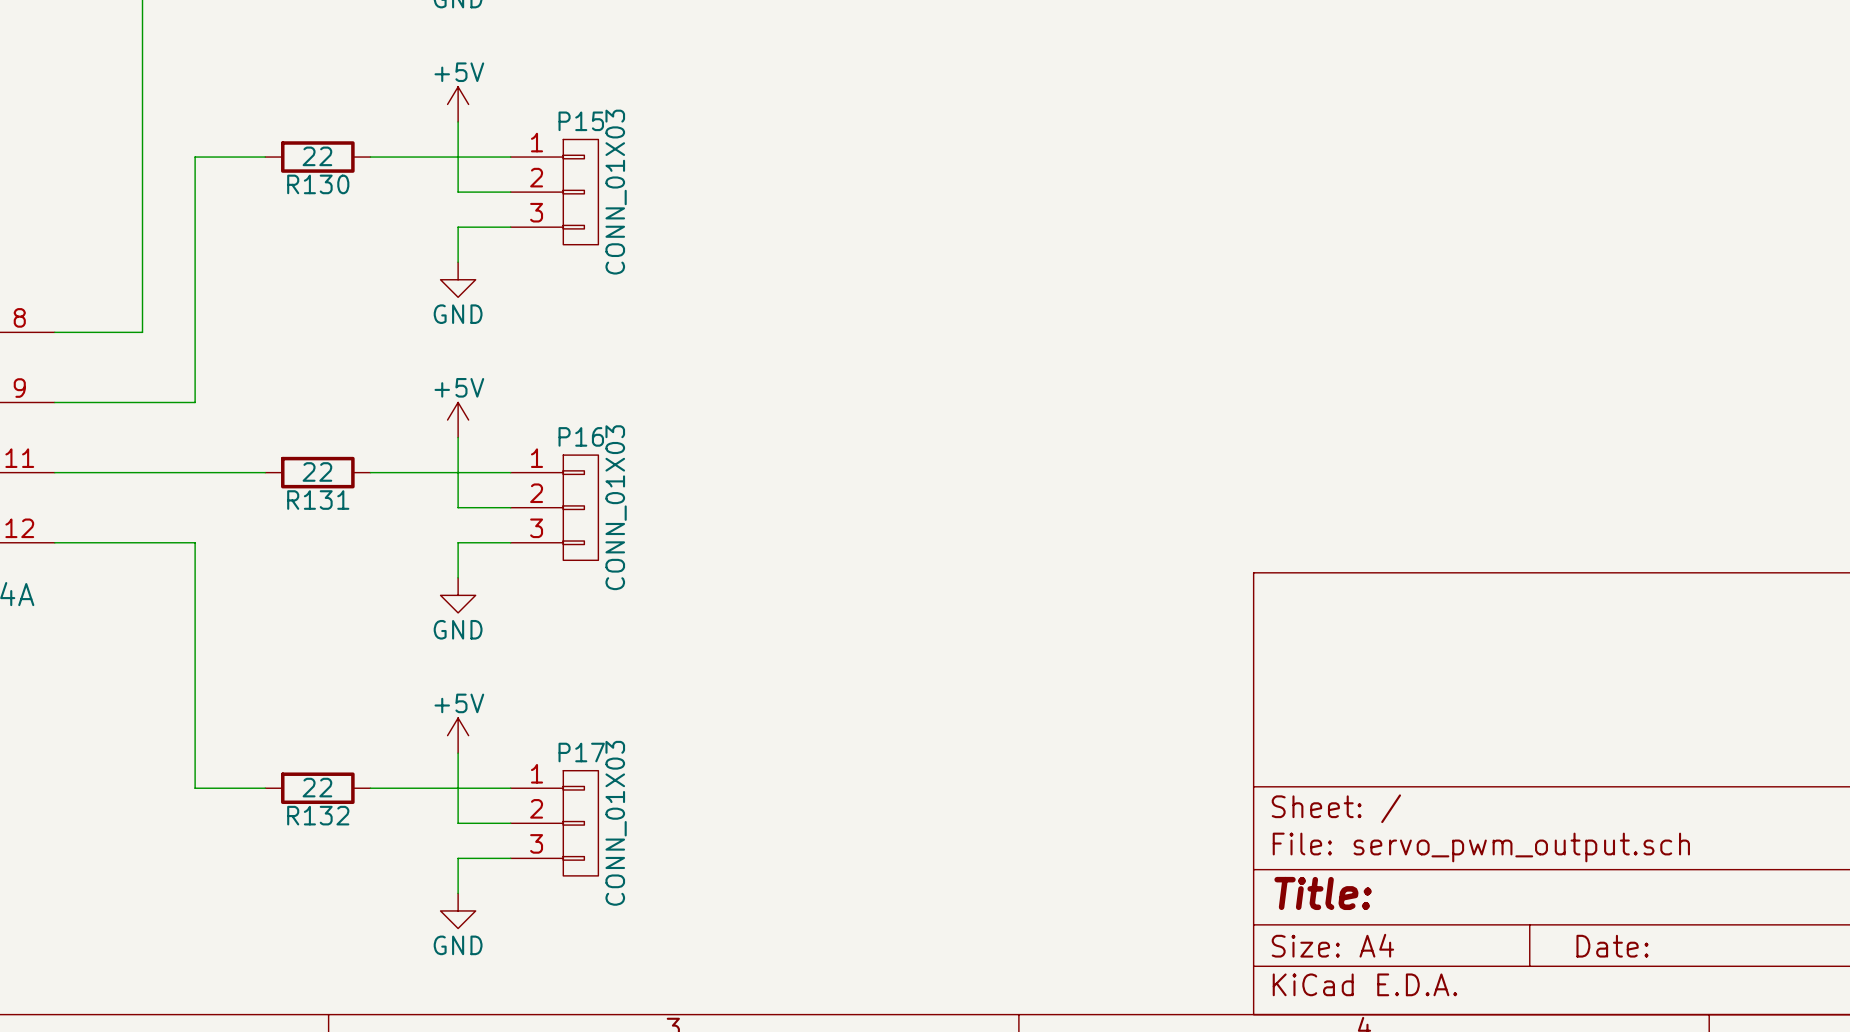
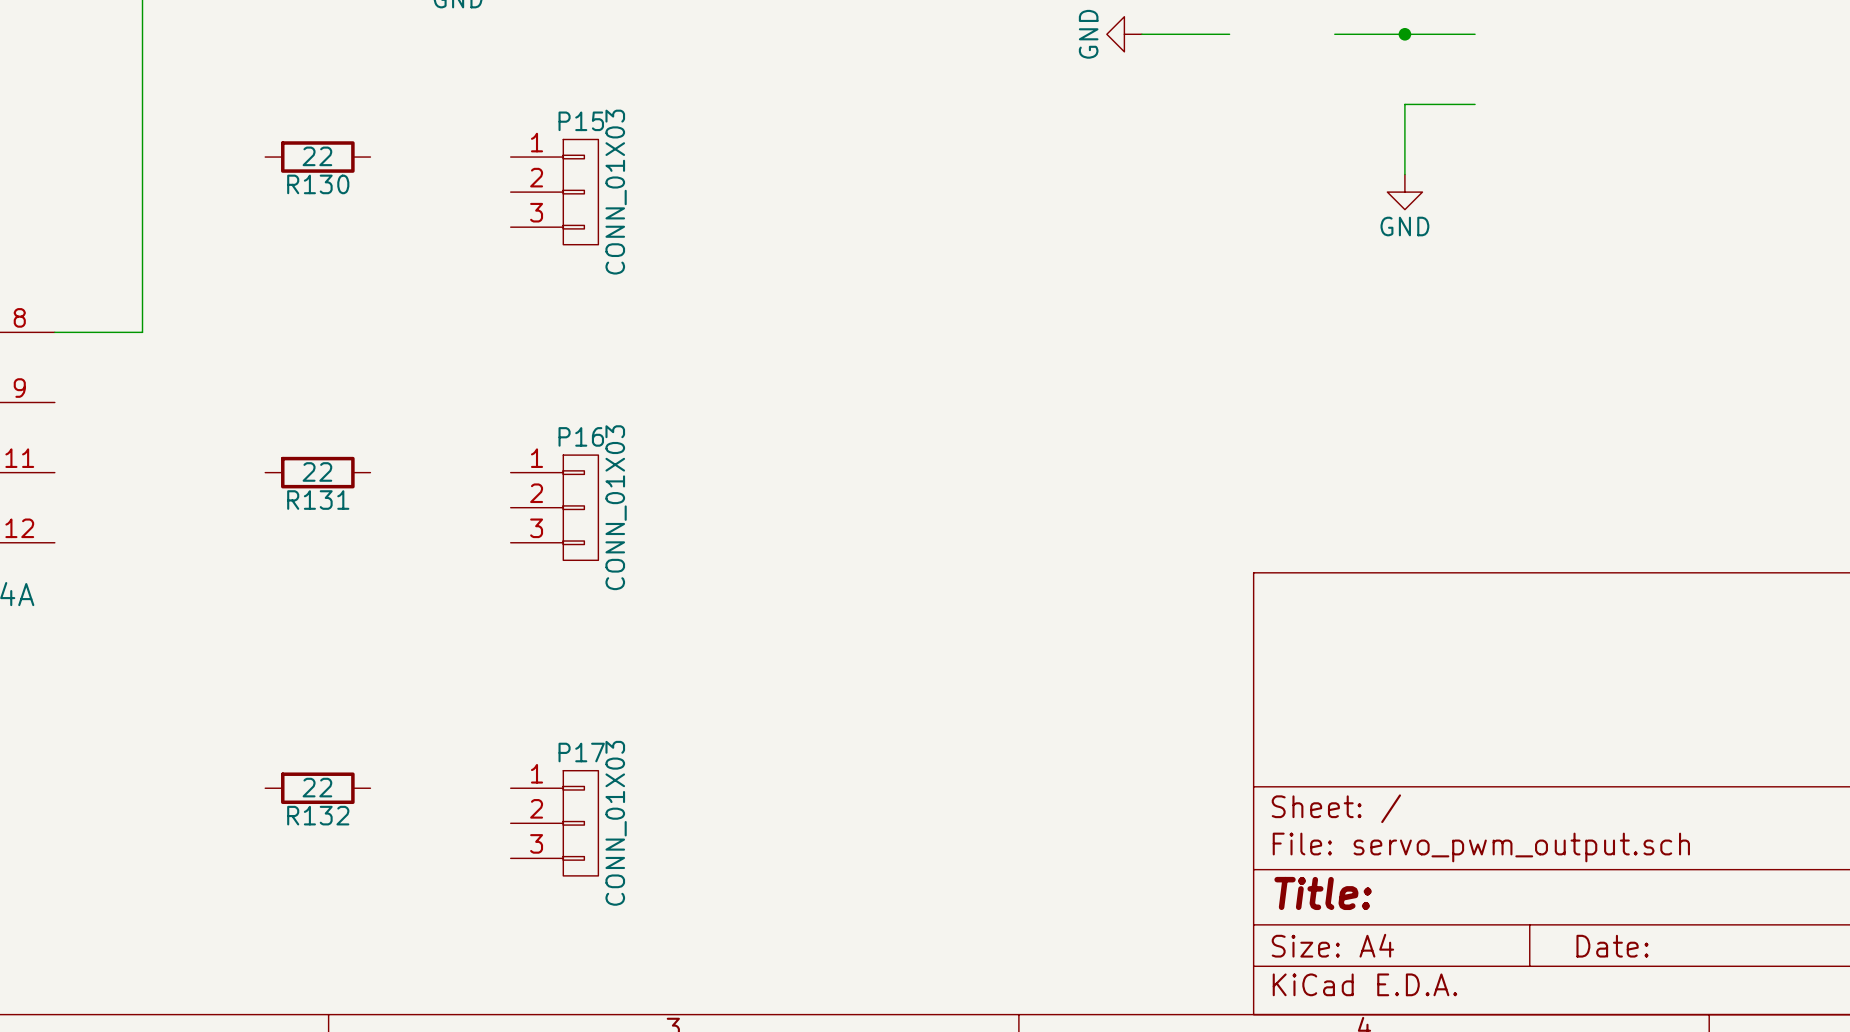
power symbol: none -> GND (1124, 34)
wire: none -> (1141, 34) (1229, 34)
wire: none -> (1334, 34) (1475, 34)
junction: none -> (1404, 34)
power symbol: +5V (458, 104) -> none
wire: none -> (1475, 104) (1404, 104) (1404, 174)
wire: (458, 121) (458, 192) (510, 192) -> none
wire: (265, 157) (195, 157) (195, 402) (54, 402) -> none
wire: (370, 157) (510, 157) -> none
power symbol: none -> GND (1404, 192)
wire: (510, 227) (458, 227) (458, 262) -> none
power symbol: GND (458, 279) -> none
power symbol: +5V (458, 420) -> none
wire: (458, 437) (458, 507) (510, 507) -> none
wire: (54, 472) (265, 472) -> none
wire: (370, 472) (510, 472) -> none
wire: (54, 542) (195, 542) (195, 788) (265, 788) -> none
wire: (510, 542) (458, 542) (458, 577) -> none
power symbol: GND (458, 595) -> none
power symbol: +5V (458, 735) -> none
wire: (458, 753) (458, 823) (510, 823) -> none
wire: (370, 788) (510, 788) -> none
wire: (510, 858) (458, 858) (458, 893) -> none
power symbol: GND (458, 910) -> none

